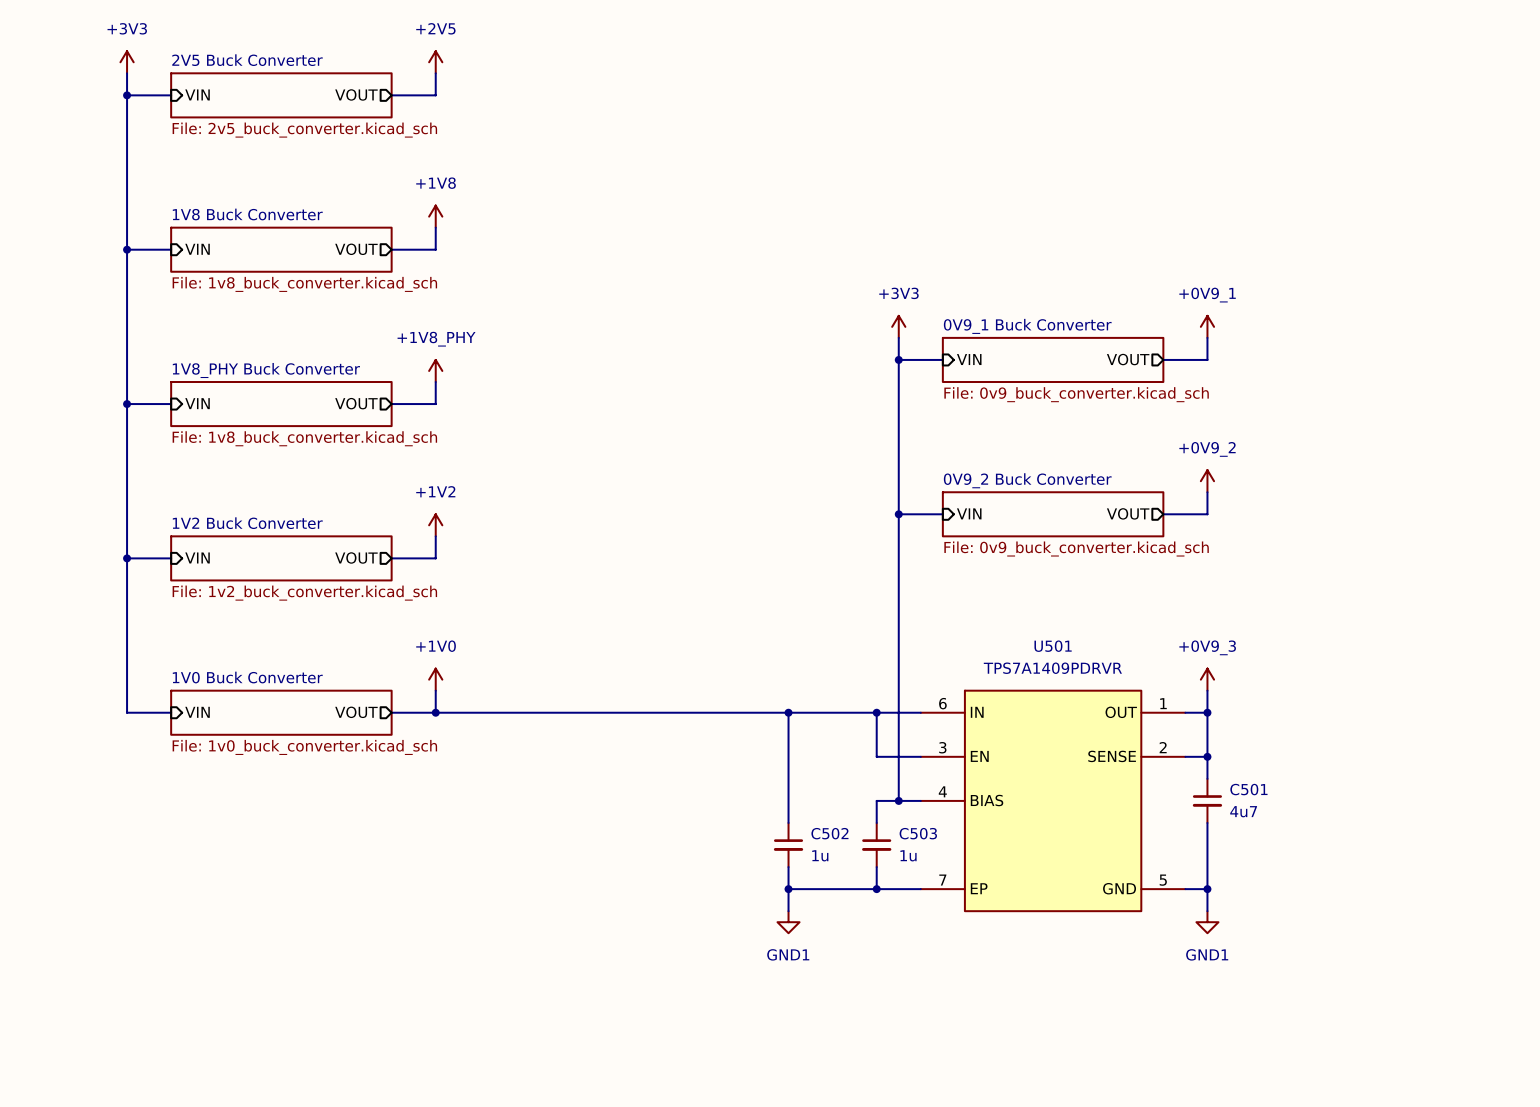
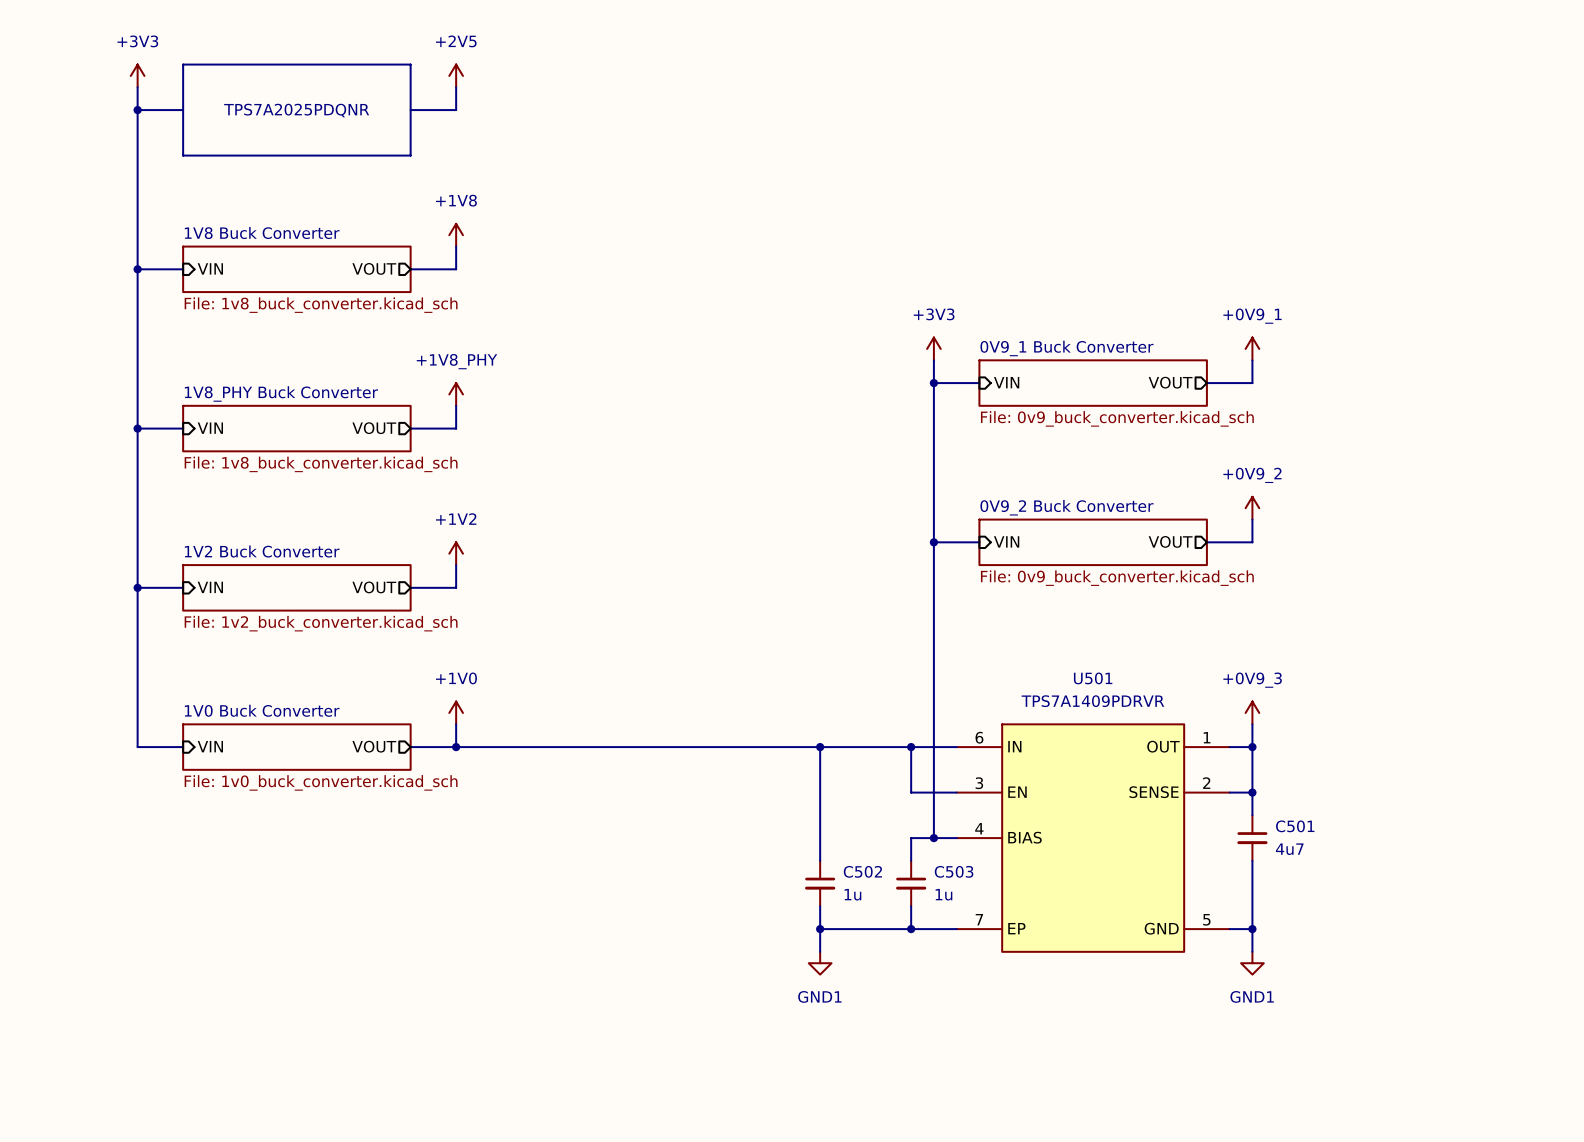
line: none -> (183, 64) (410, 64) (410, 155) (183, 155) (183, 64)
sheet pin: VIN (197, 94) -> none
sheet pin: VOUT (356, 94) -> none
sheet 2V5 Buck Converter: File: 2v5_buck_converter.kicad_sch (281, 95) -> none
text: none -> TPS7A2025PDQNR (296, 110)

